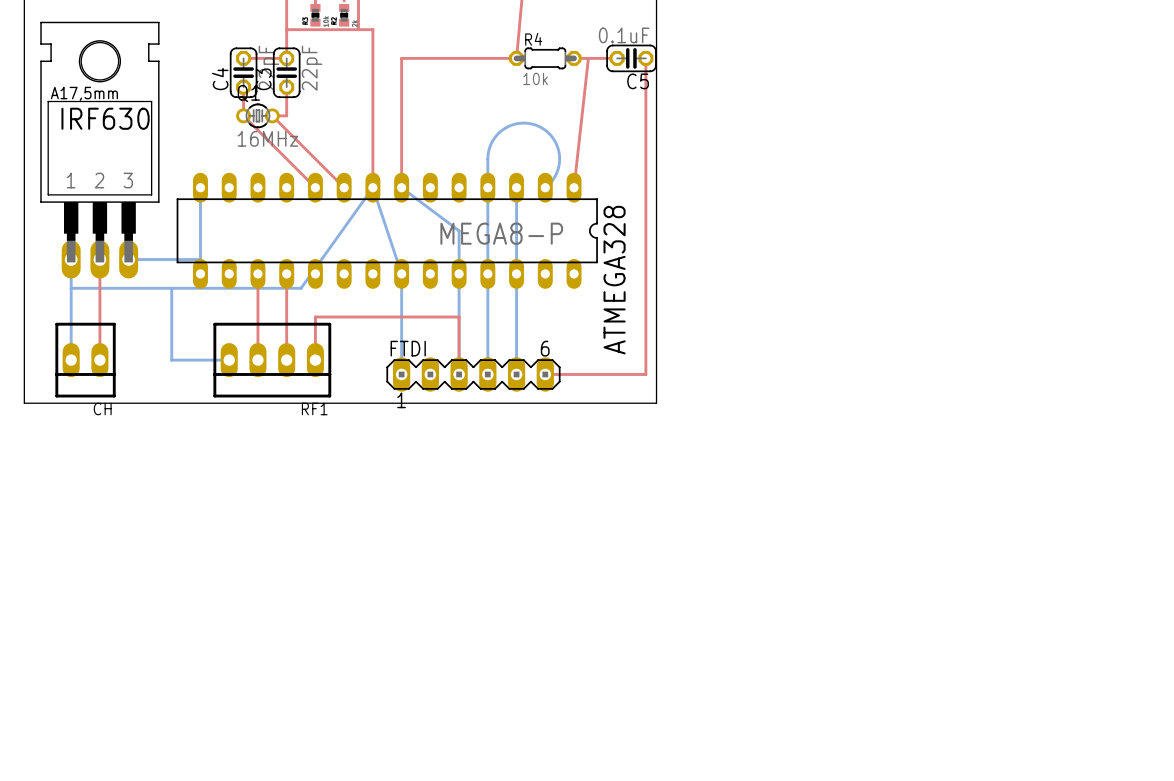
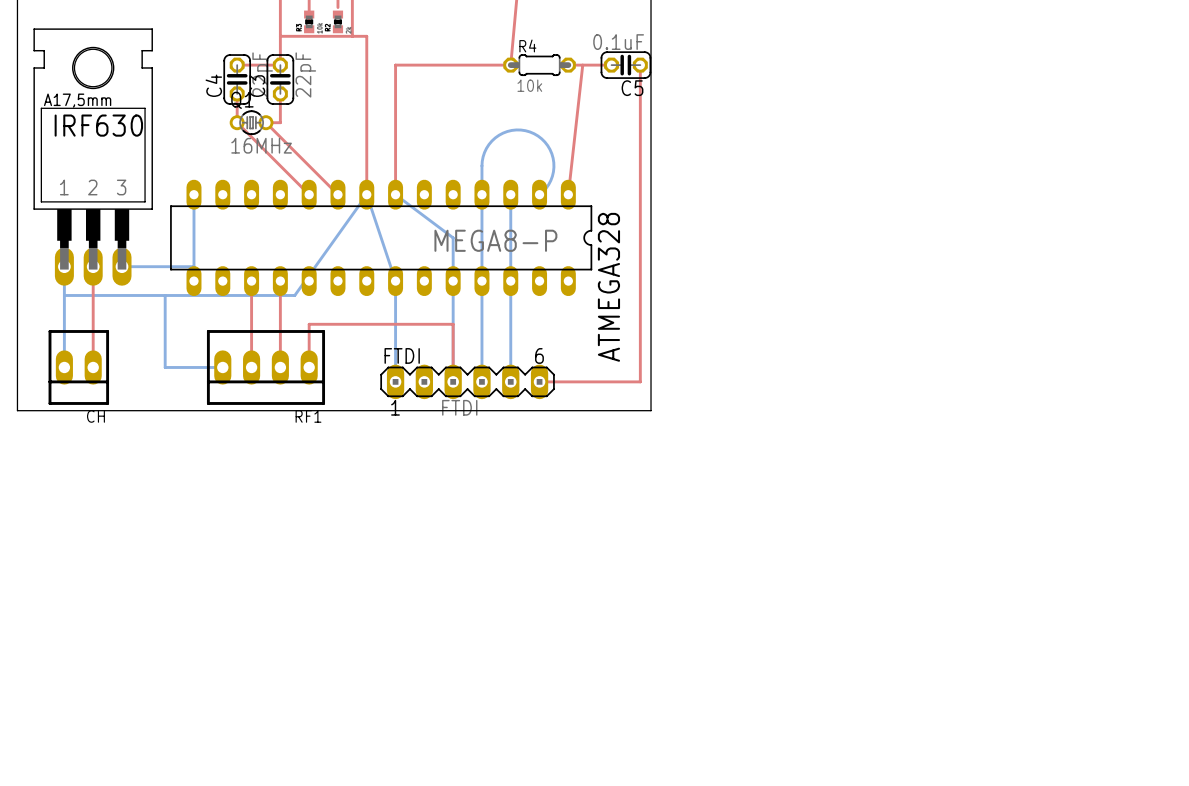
FTDI value: none -> FTDI (459, 407)

